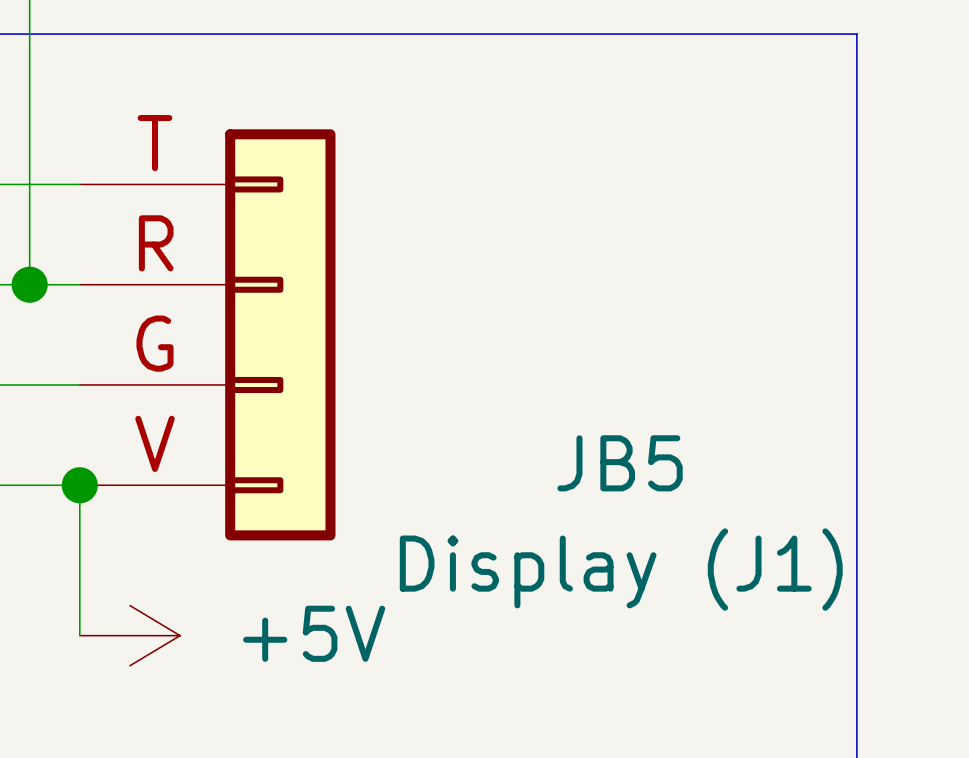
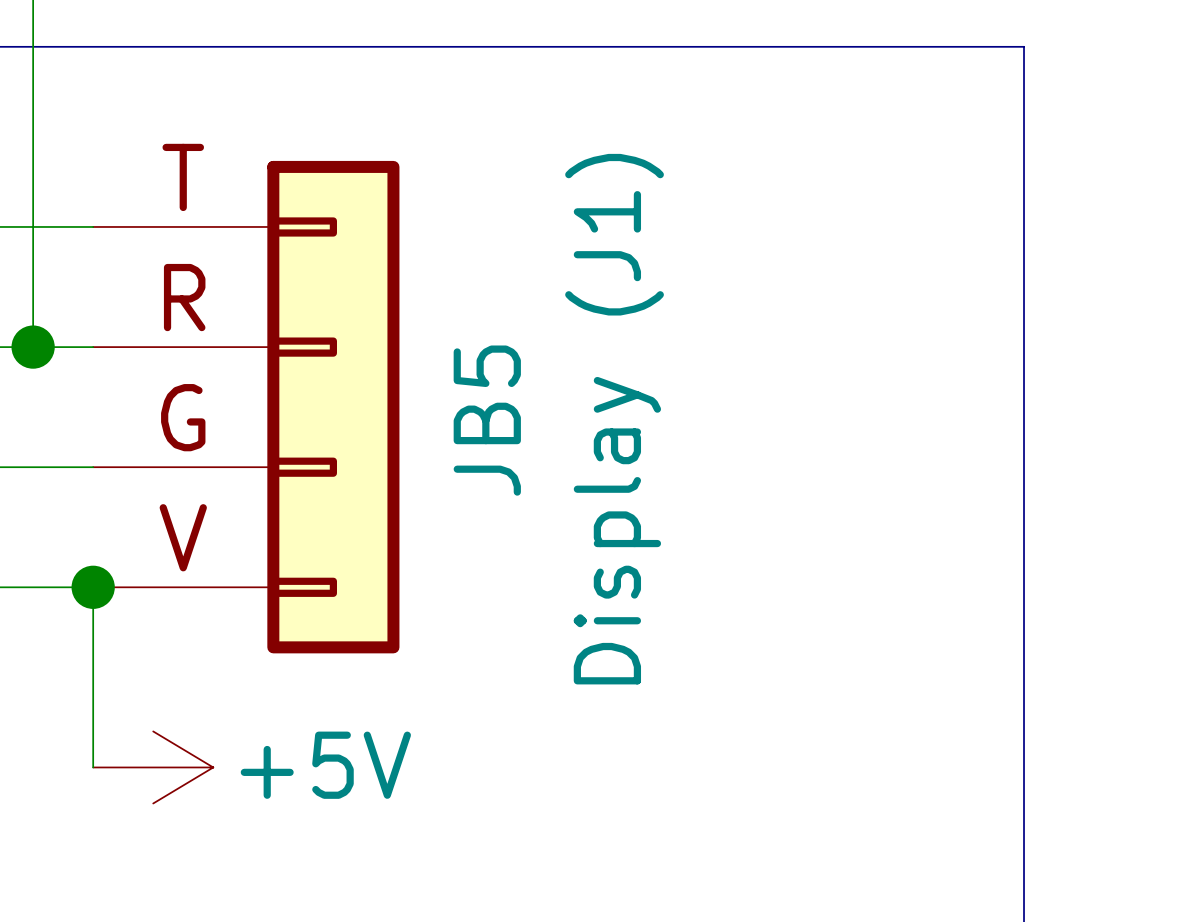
JB5 name rotation: 0° (620, 463) -> 90° counterclockwise (487, 420)
JB5 name position: JB5 (620, 463) -> JB5 (487, 420)
JB5 value rotation: 0° (621, 569) -> 90° counterclockwise (614, 419)
power symbol text position: +5V (314, 633) -> +5V (325, 765)

